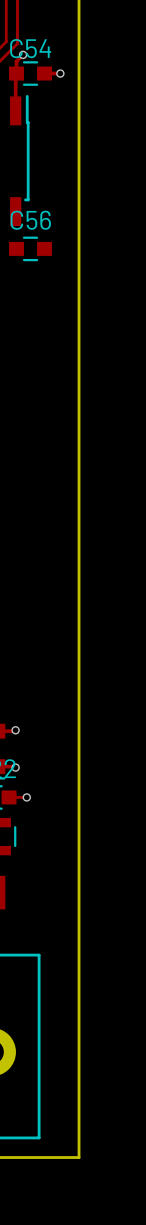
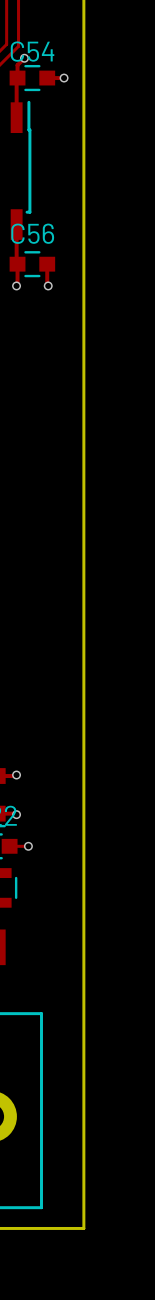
track: none -> (16, 224) (16, 285)
track: none -> (47, 264) (48, 285)
via: none -> (16, 285)
via: none -> (48, 285)

